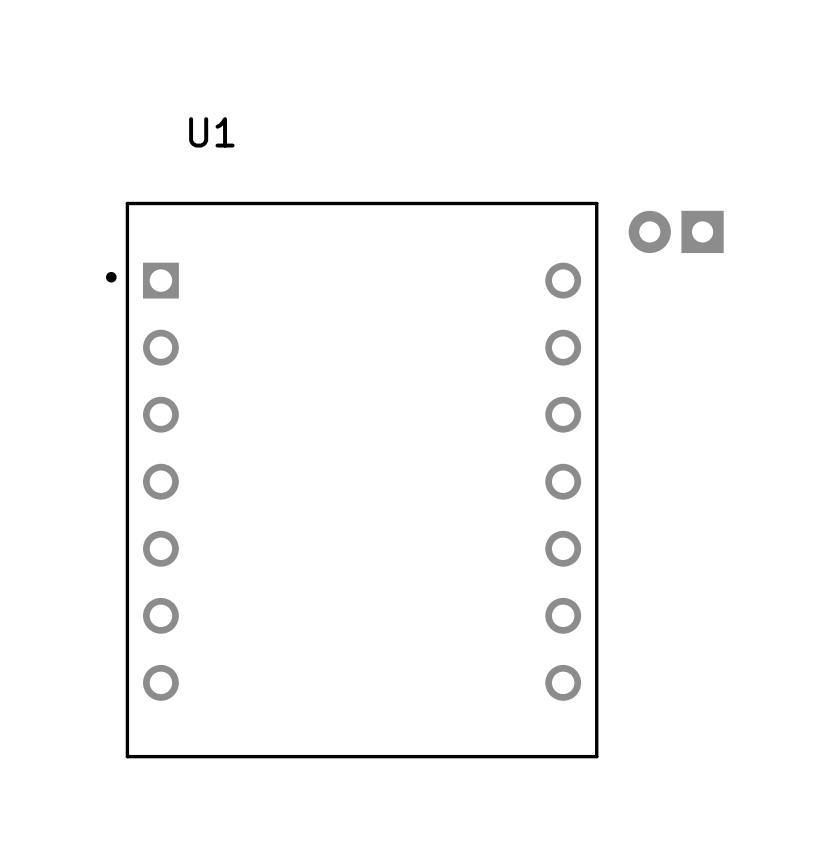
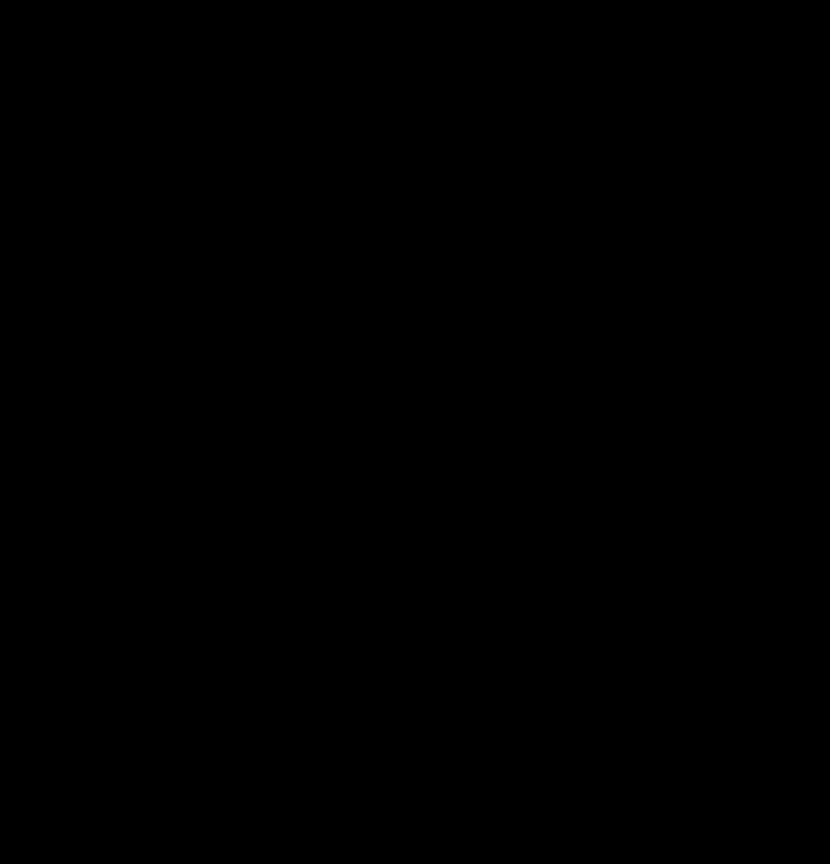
part: (676, 231) -> none
U1: (352, 480) -> none

